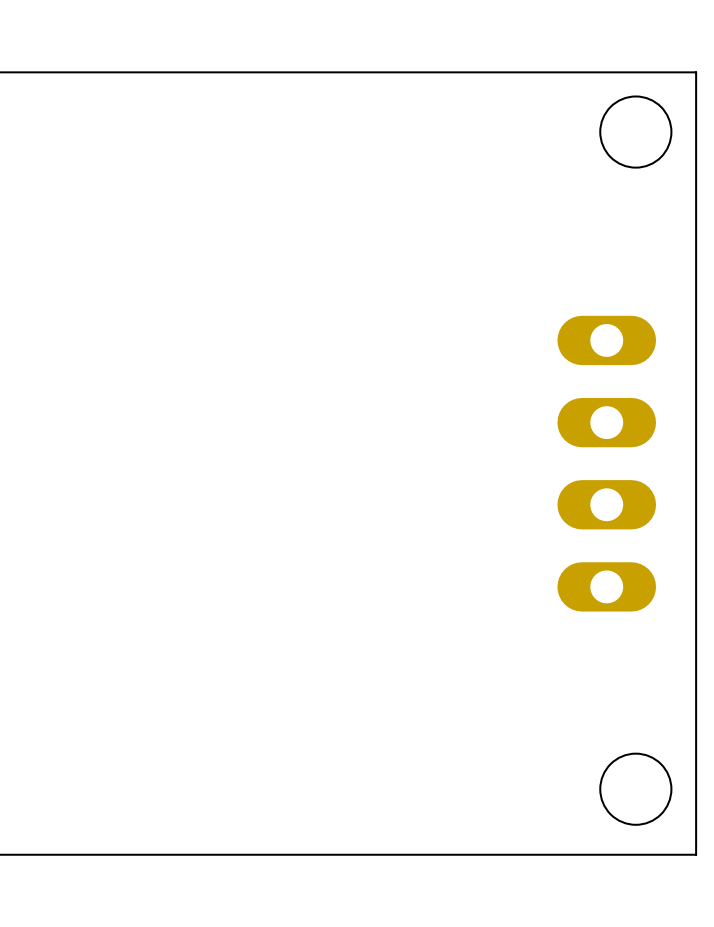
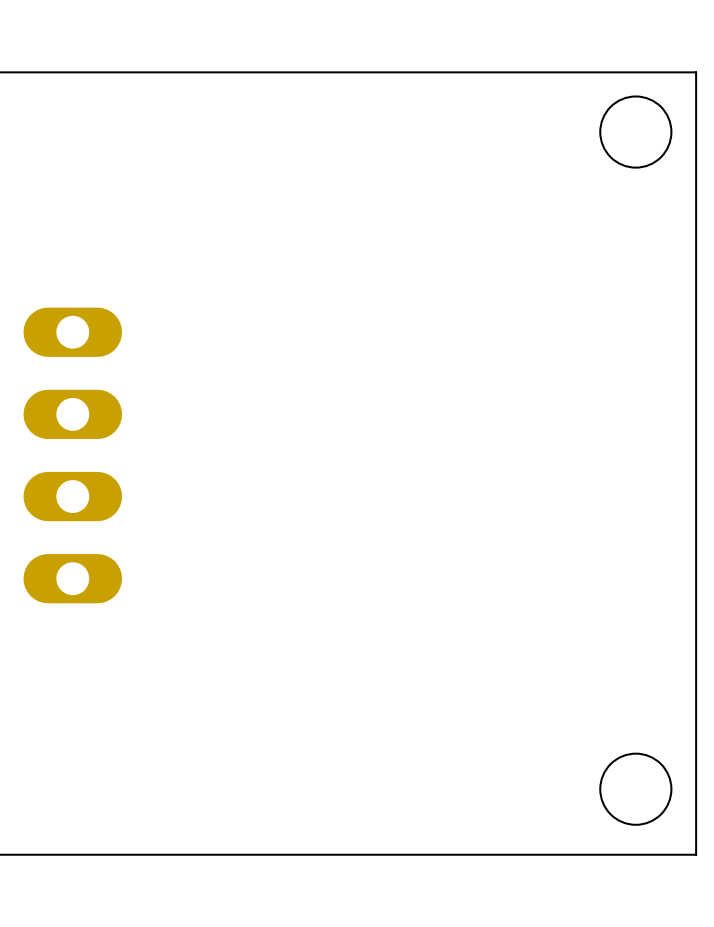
part position: (606, 463) -> (72, 455)

